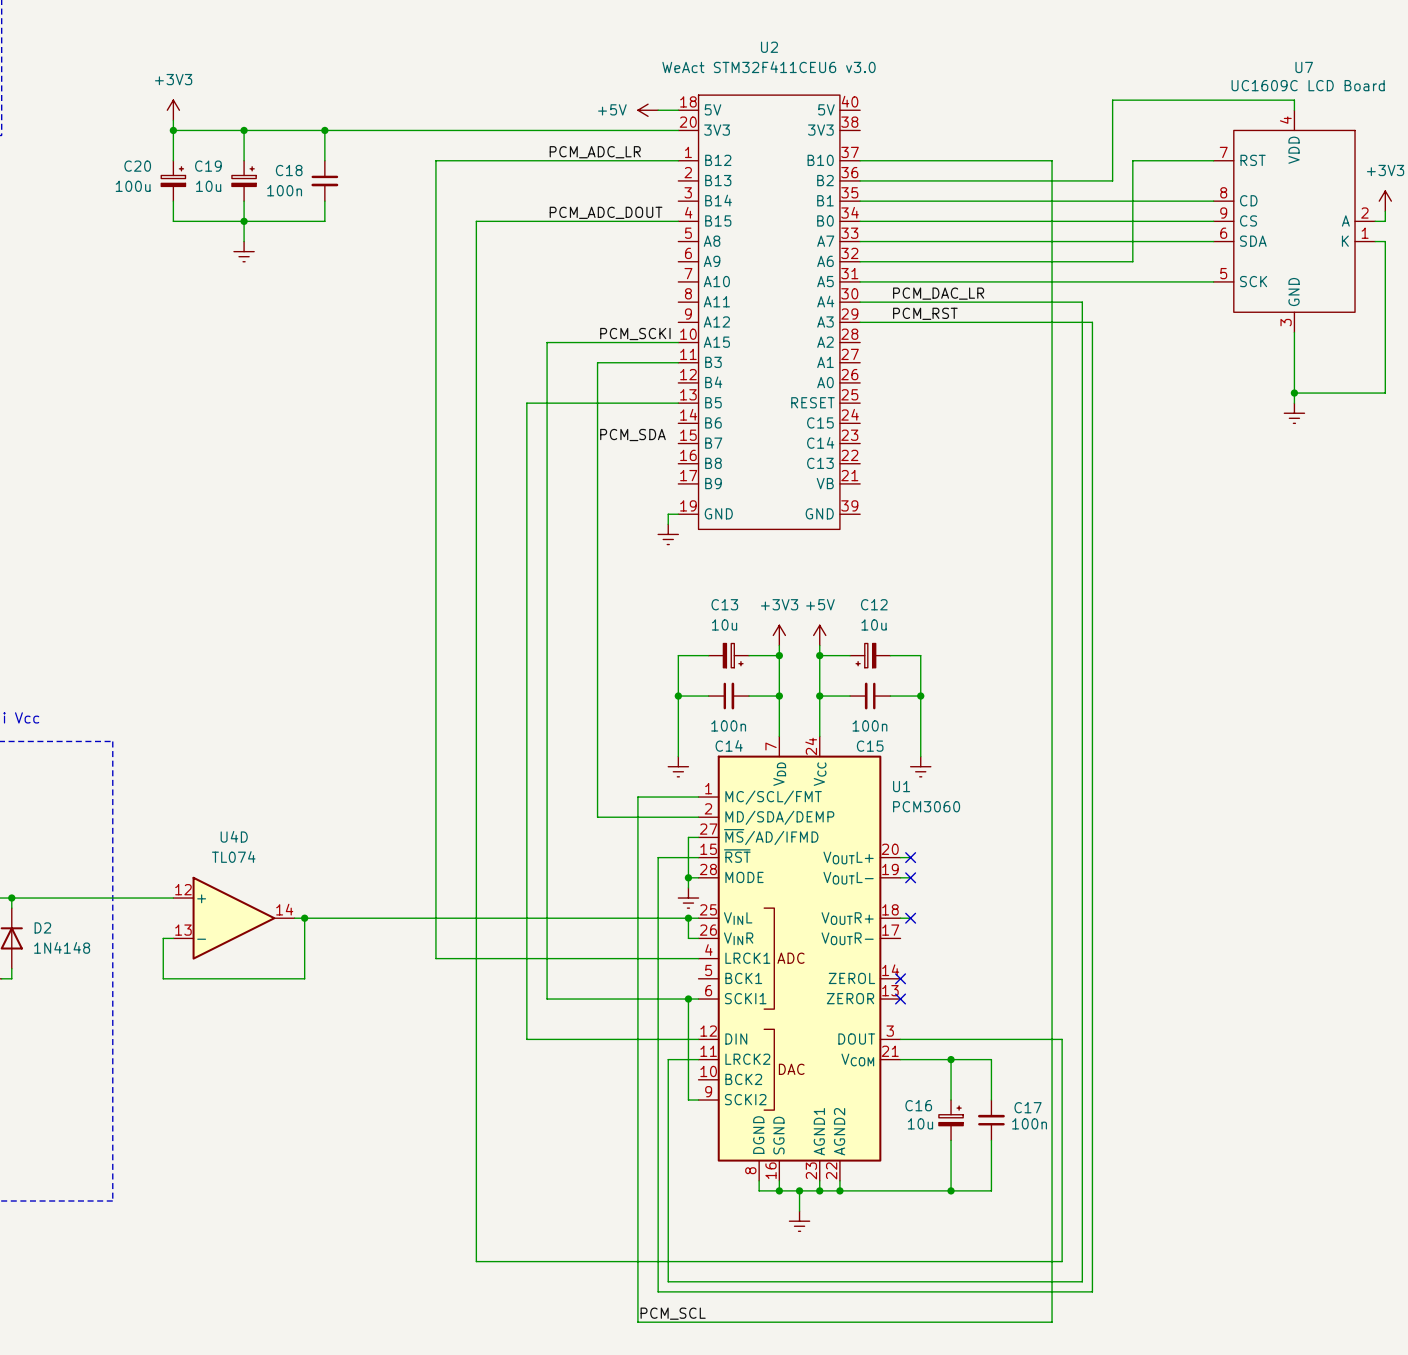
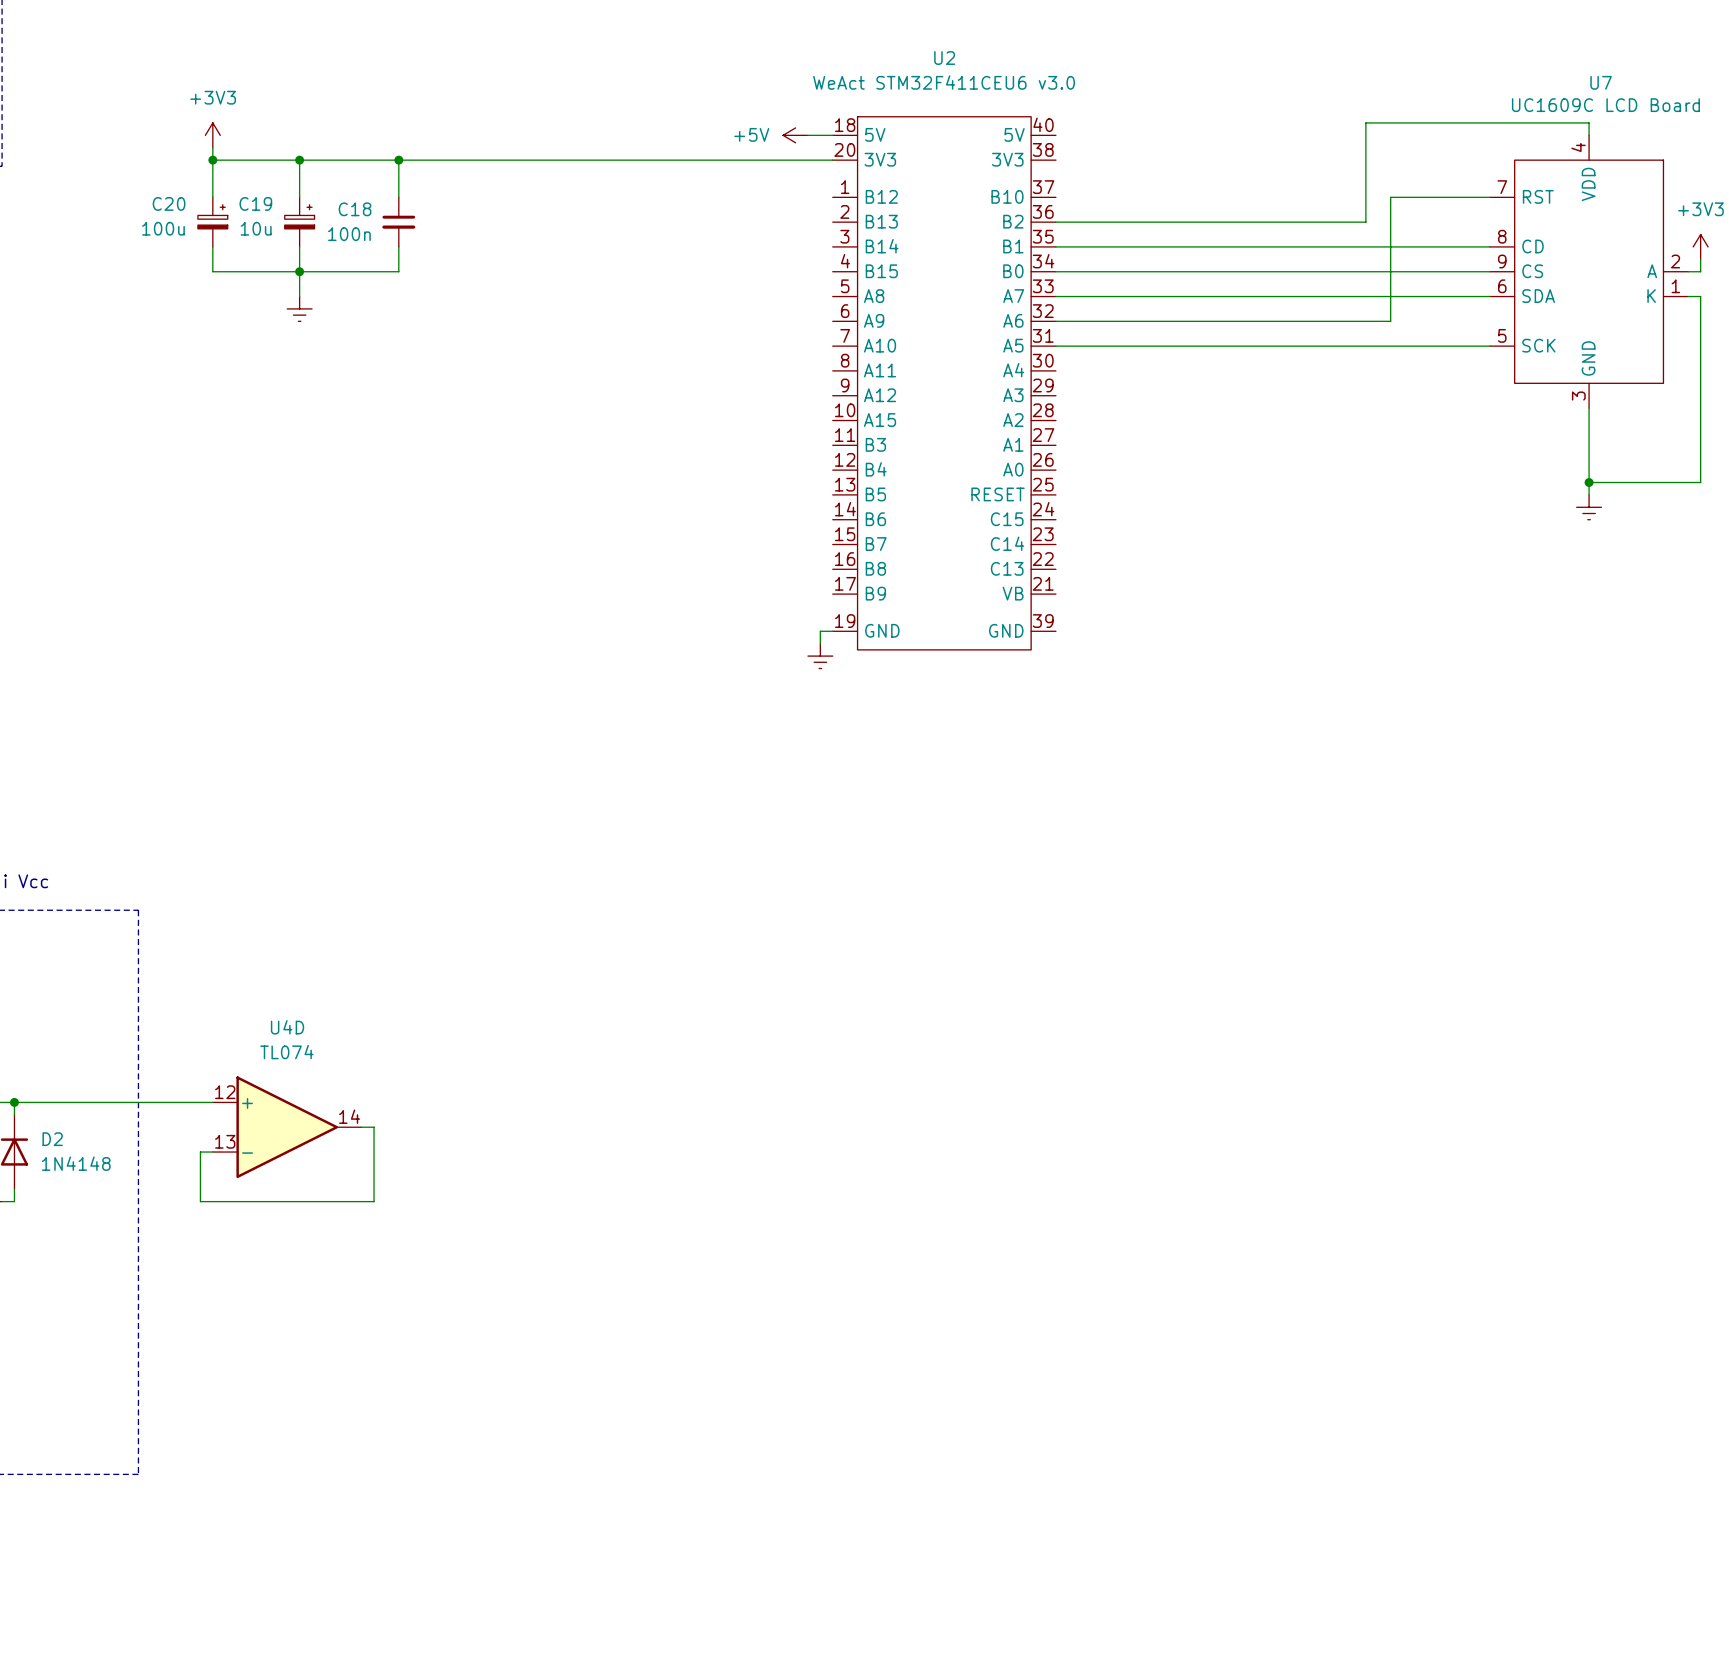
label: PCM_ADC_LR (595, 152) -> none
wire: (678, 160) (435, 160) (435, 958) (698, 958) -> none
wire: (860, 160) (1052, 160) (1052, 1322) (637, 1322) (637, 797) (698, 797) -> none
label: PCM_ADC_DOUT (606, 212) -> none
wire: (678, 221) (476, 221) (476, 1261) (1062, 1261) (1062, 1039) (900, 1039) -> none
label: PCM_DAC_LR (938, 293) -> none
wire: (860, 302) (1082, 302) (1082, 1281) (668, 1281) (668, 1059) (698, 1059) -> none
label: PCM_RST (925, 313) -> none
wire: (860, 322) (1092, 322) (1092, 1291) (658, 1291) (658, 857) (698, 857) -> none
label: PCM_SCKI (635, 334) -> none
wire: (678, 342) (547, 342) (547, 999) (698, 999) -> none
wire: (678, 362) (597, 362) (597, 817) (698, 817) -> none
wire: (678, 403) (526, 403) (526, 1039) (698, 1039) -> none
label: PCM_SDA (632, 435) -> none
power symbol: +3V3 (779, 635) -> none
power symbol: +5V (819, 635) -> none
wire: (779, 645) (779, 736) -> none
wire: (819, 645) (819, 736) -> none
wire: (708, 655) (678, 655) (678, 756) -> none
C13: 10u (728, 655) -> none
wire: (749, 655) (779, 655) -> none
junction: (779, 655) -> none
wire: (819, 655) (850, 655) -> none
junction: (819, 655) -> none
C12: 10u (870, 655) -> none
wire: (890, 655) (920, 655) (920, 756) -> none
wire: (678, 696) (708, 696) -> none
junction: (678, 696) -> none
C14: 100n (728, 696) -> none
wire: (749, 696) (779, 696) -> none
junction: (779, 696) -> none
wire: (819, 696) (850, 696) -> none
junction: (819, 696) -> none
C15: 100n (870, 696) -> none
wire: (890, 696) (920, 696) -> none
junction: (920, 696) -> none
power symbol: (678, 766) -> none
power symbol: (920, 766) -> none
wire: (698, 837) (688, 837) (688, 887) -> none
wire: (900, 857) (910, 857) -> none
no-connect mark: (910, 857) -> none
wire: (688, 877) (698, 877) -> none
junction: (688, 877) -> none
wire: (900, 877) (910, 877) -> none
no-connect mark: (910, 877) -> none
power symbol: (688, 898) -> none
wire: (304, 918) (698, 918) -> none
junction: (304, 918) -> none
wire: (688, 918) (688, 938) (698, 938) -> none
junction: (688, 918) -> none
wire: (900, 918) (910, 918) -> none
no-connect mark: (910, 918) -> none
U1: PCM3060 (799, 958) -> none
no-connect mark: (900, 978) -> none
wire: (688, 999) (688, 1100) (698, 1100) -> none
junction: (688, 999) -> none
no-connect mark: (900, 999) -> none
wire: (900, 1059) (991, 1059) (991, 1100) -> none
wire: (951, 1059) (951, 1100) -> none
junction: (951, 1059) -> none
C16: 10u (951, 1120) -> none
C17: 100n (991, 1120) -> none
wire: (951, 1140) (951, 1190) -> none
wire: (991, 1140) (991, 1190) (759, 1190) (759, 1180) -> none
wire: (779, 1180) (779, 1190) -> none
wire: (819, 1180) (819, 1190) -> none
wire: (839, 1180) (839, 1190) -> none
junction: (779, 1190) -> none
wire: (799, 1190) (799, 1211) -> none
junction: (799, 1190) -> none
junction: (819, 1190) -> none
junction: (839, 1190) -> none
junction: (951, 1190) -> none
power symbol: (799, 1221) -> none
label: PCM_SCL (673, 1313) -> none

